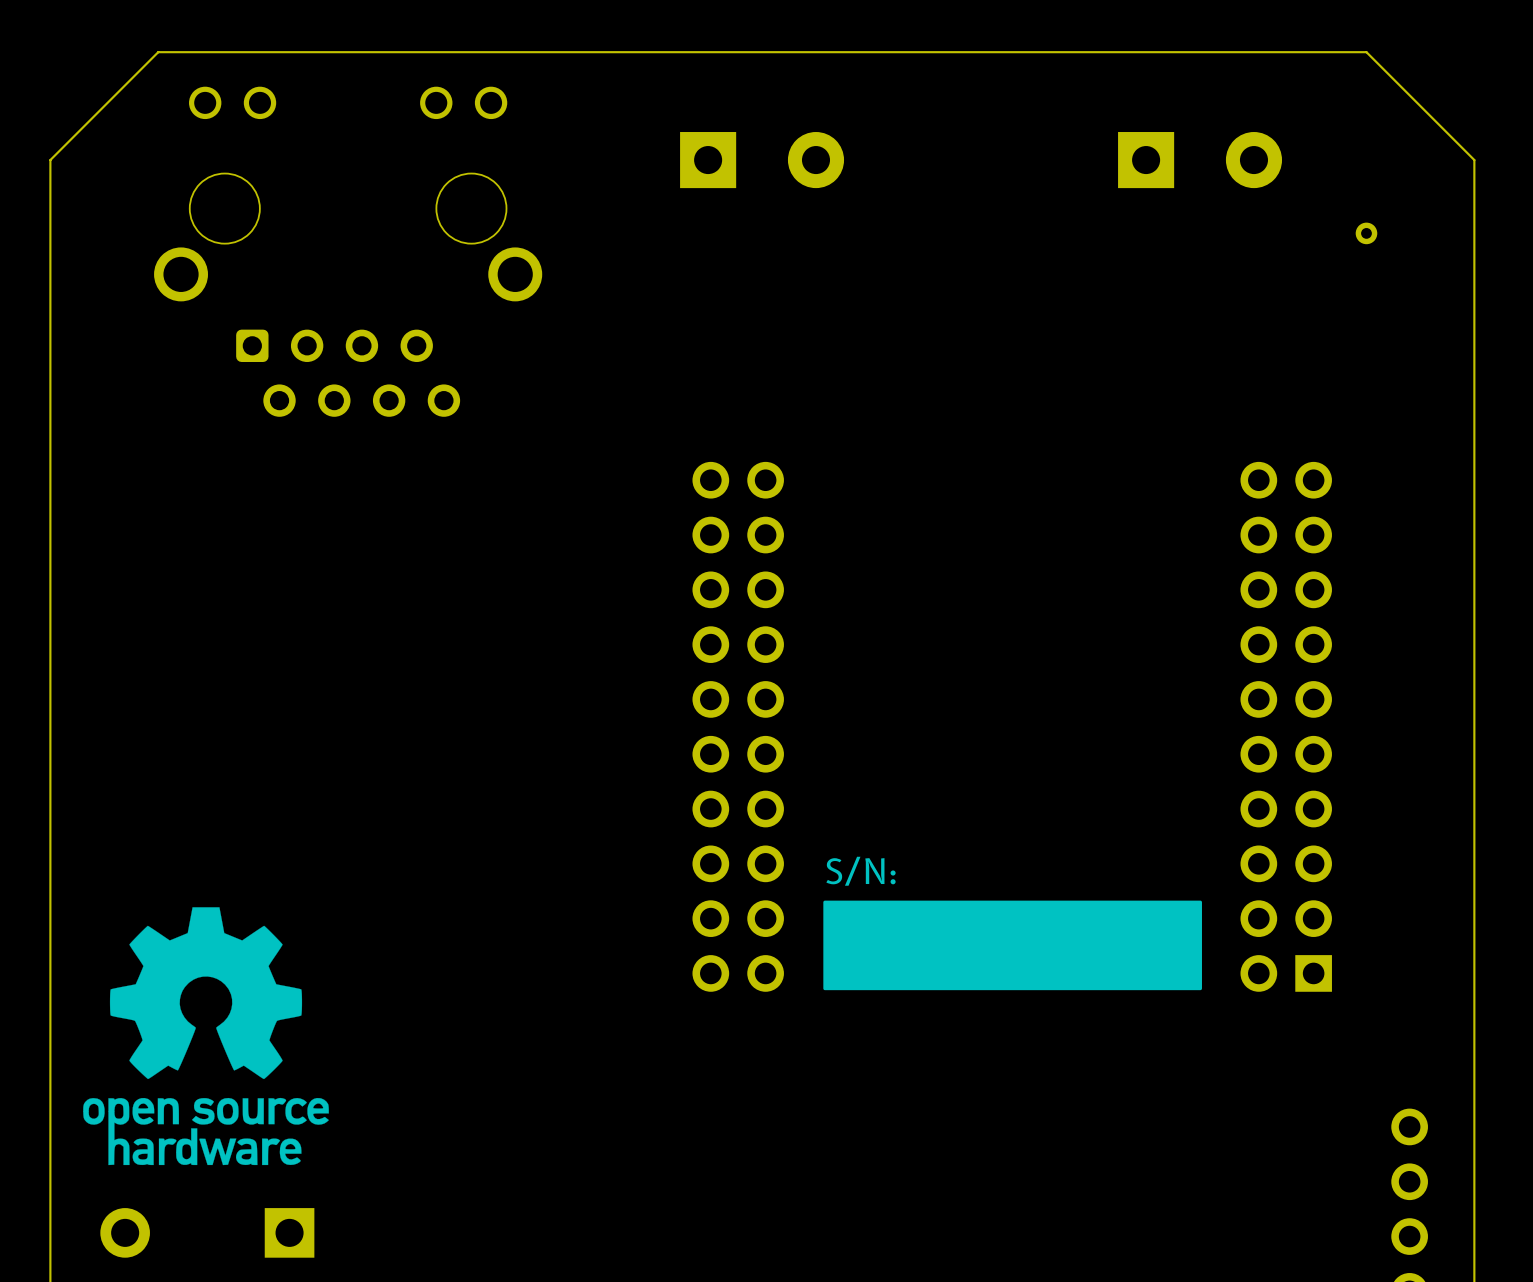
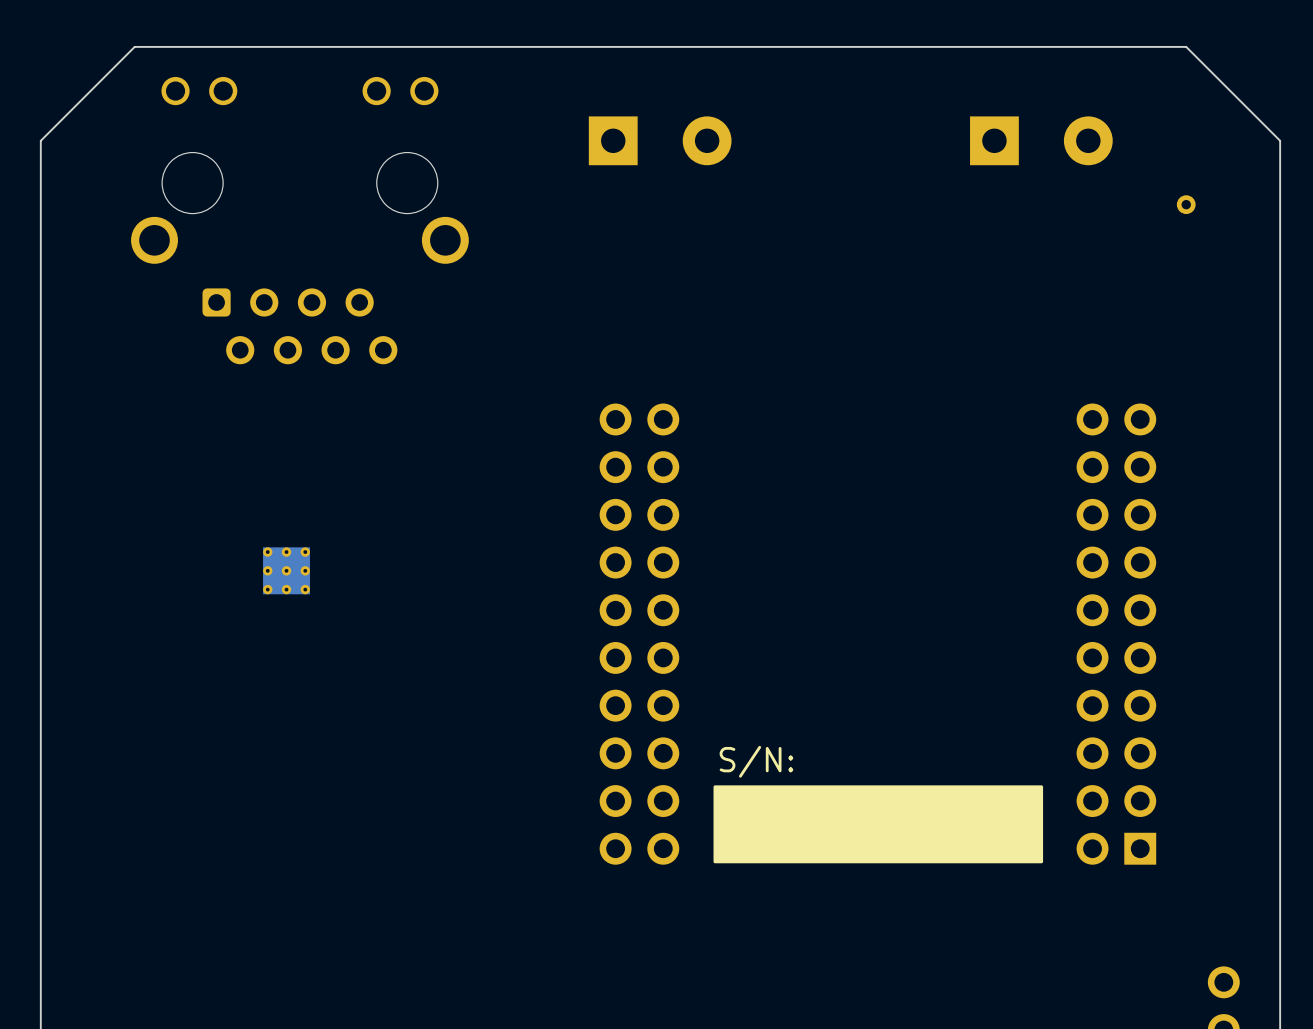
part: none -> (286, 570)
drawing: [83, 907, 329, 1166] -> none

